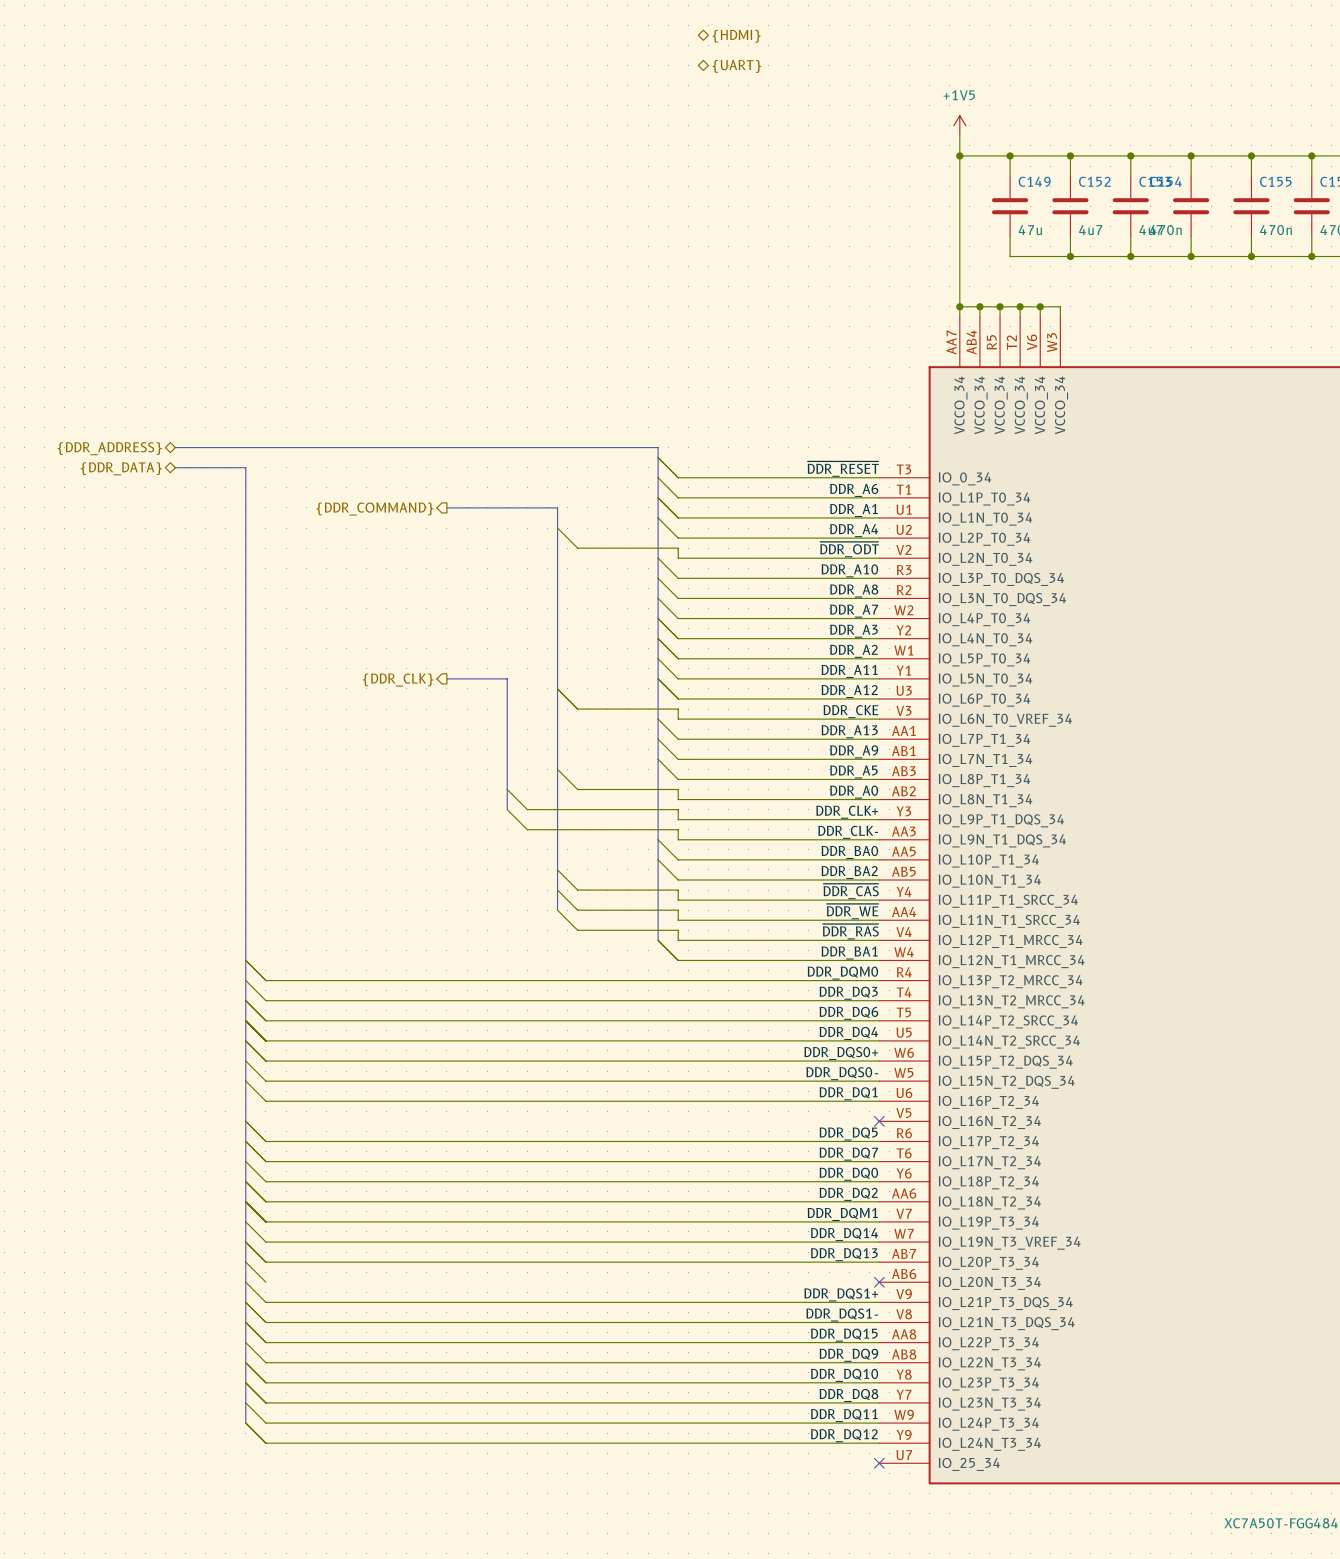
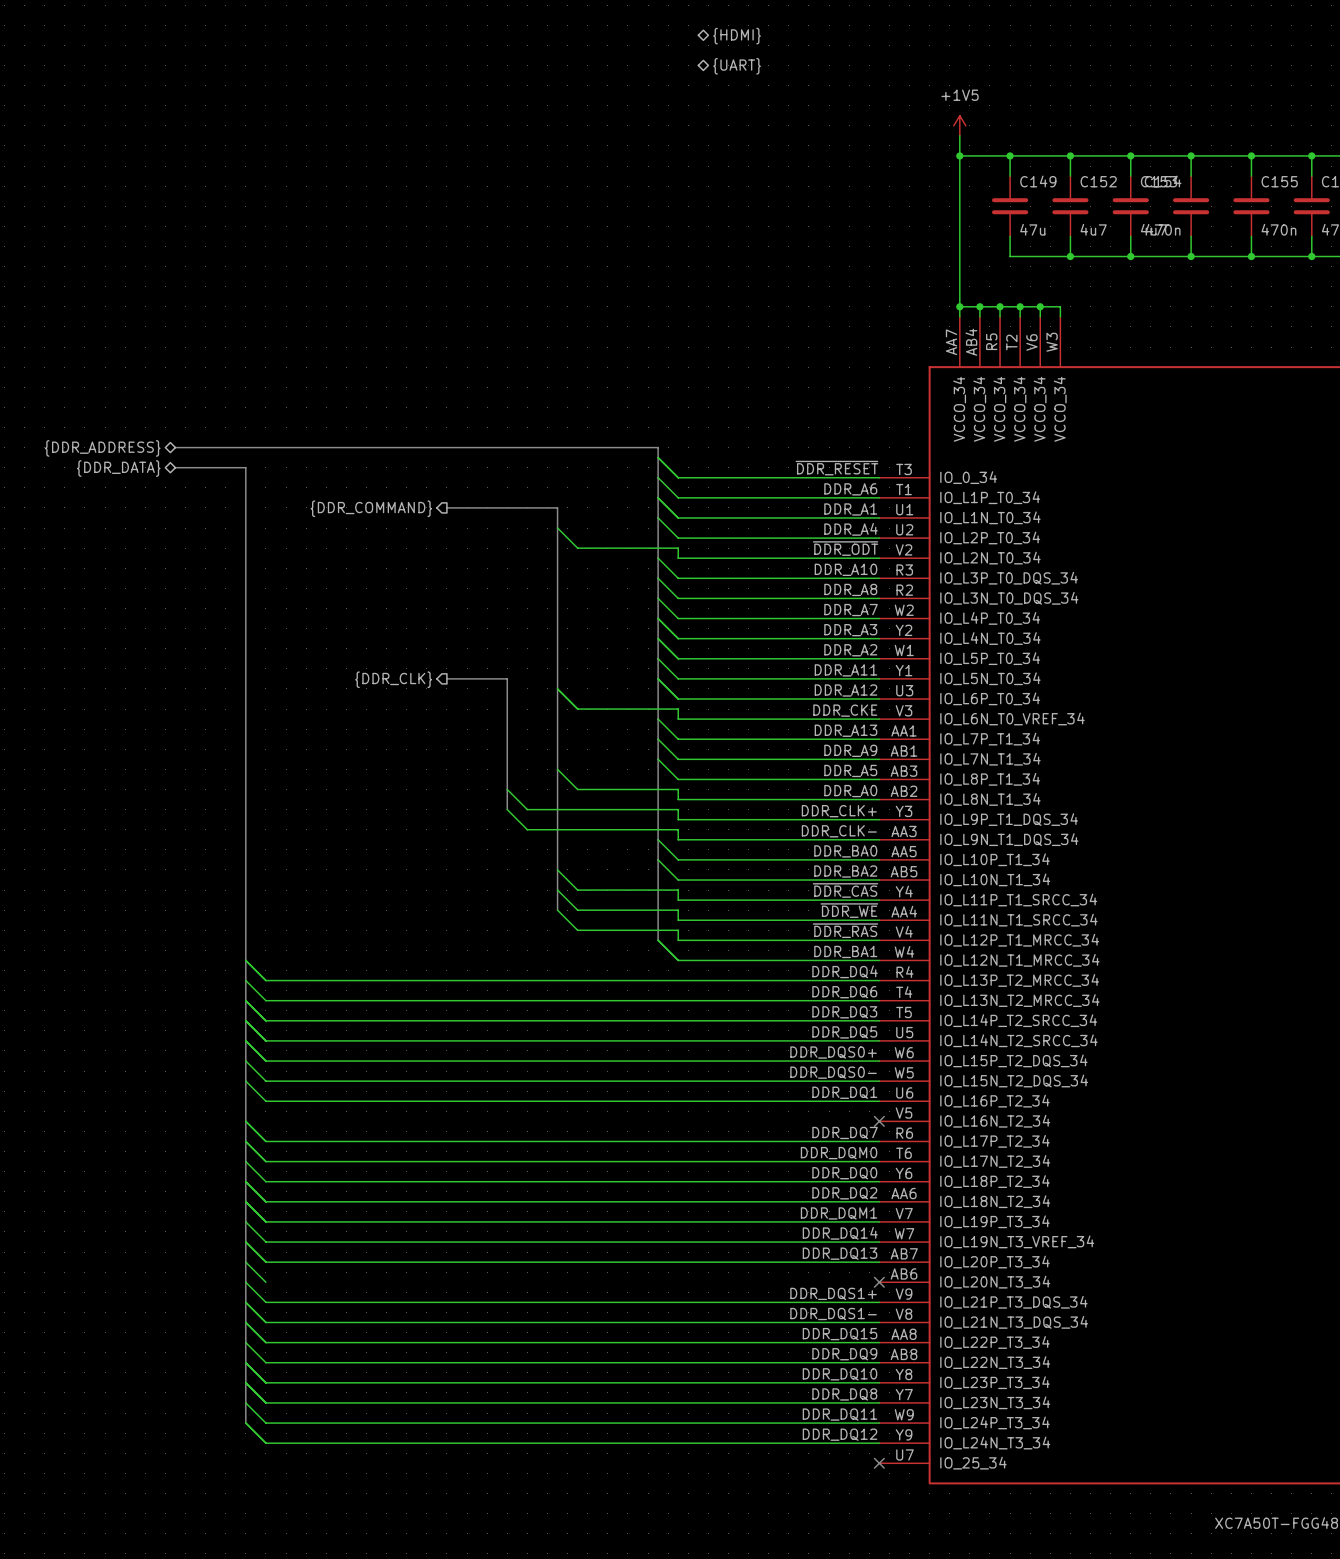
label: DDR_DQM0 (842, 973) -> DDR_DQ4 (845, 971)
label: DDR_DQ3 (848, 993) -> DDR_DQ6 (844, 992)
label: DDR_DQ6 (848, 1013) -> DDR_DQ3 (844, 1012)
label: DDR_DQ4 (848, 1033) -> DDR_DQ5 (844, 1032)
label: DDR_DQ5 (848, 1134) -> DDR_DQ7 (845, 1132)
label: DDR_DQ7 (848, 1154) -> DDR_DQM0 (839, 1153)

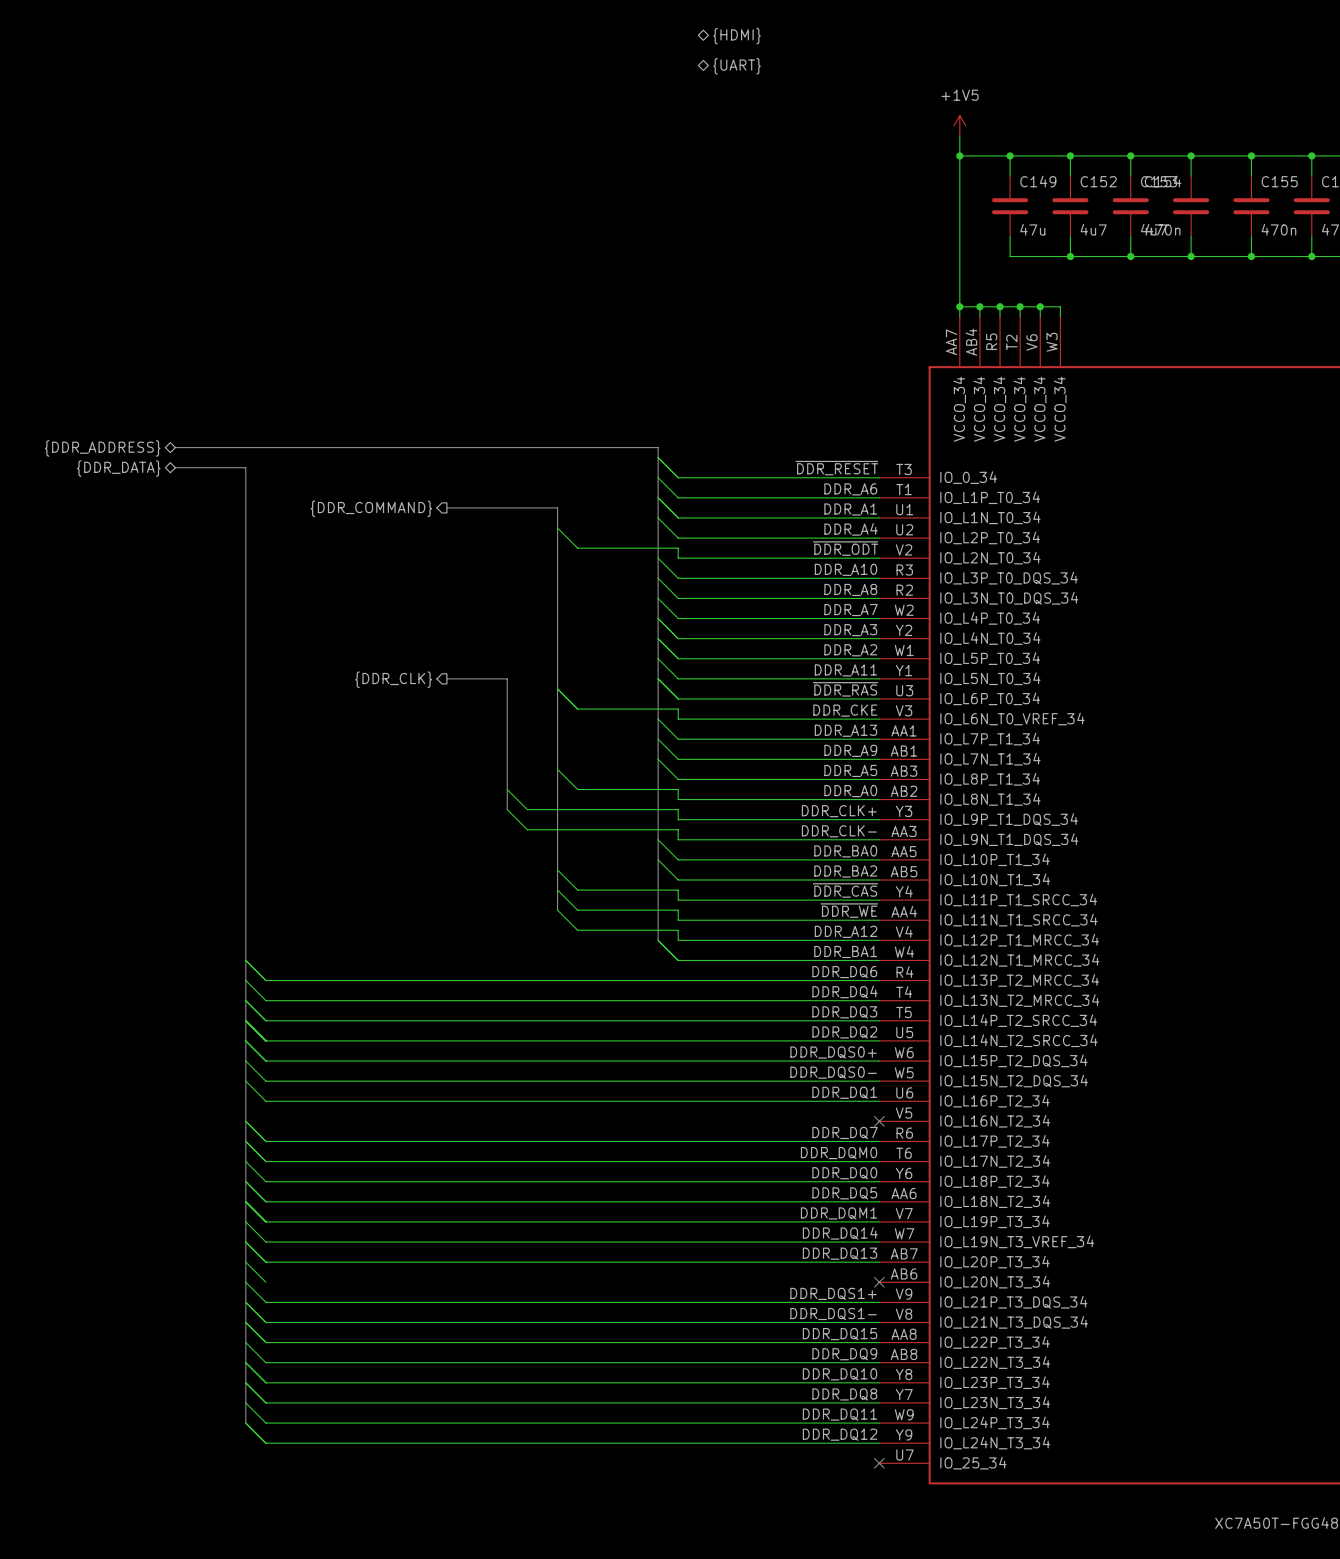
label: DDR_A12 (846, 690) -> ~{DDR_RAS} (845, 689)
label: ~{DDR_RAS} (845, 930) -> DDR_A12 (846, 931)
label: DDR_DQ4 (845, 971) -> DDR_DQ6 (844, 972)
label: DDR_DQ6 (844, 992) -> DDR_DQ4 (845, 991)
label: DDR_DQ5 (844, 1032) -> DDR_DQ2 (844, 1032)
label: DDR_DQ2 (844, 1193) -> DDR_DQ5 (844, 1193)

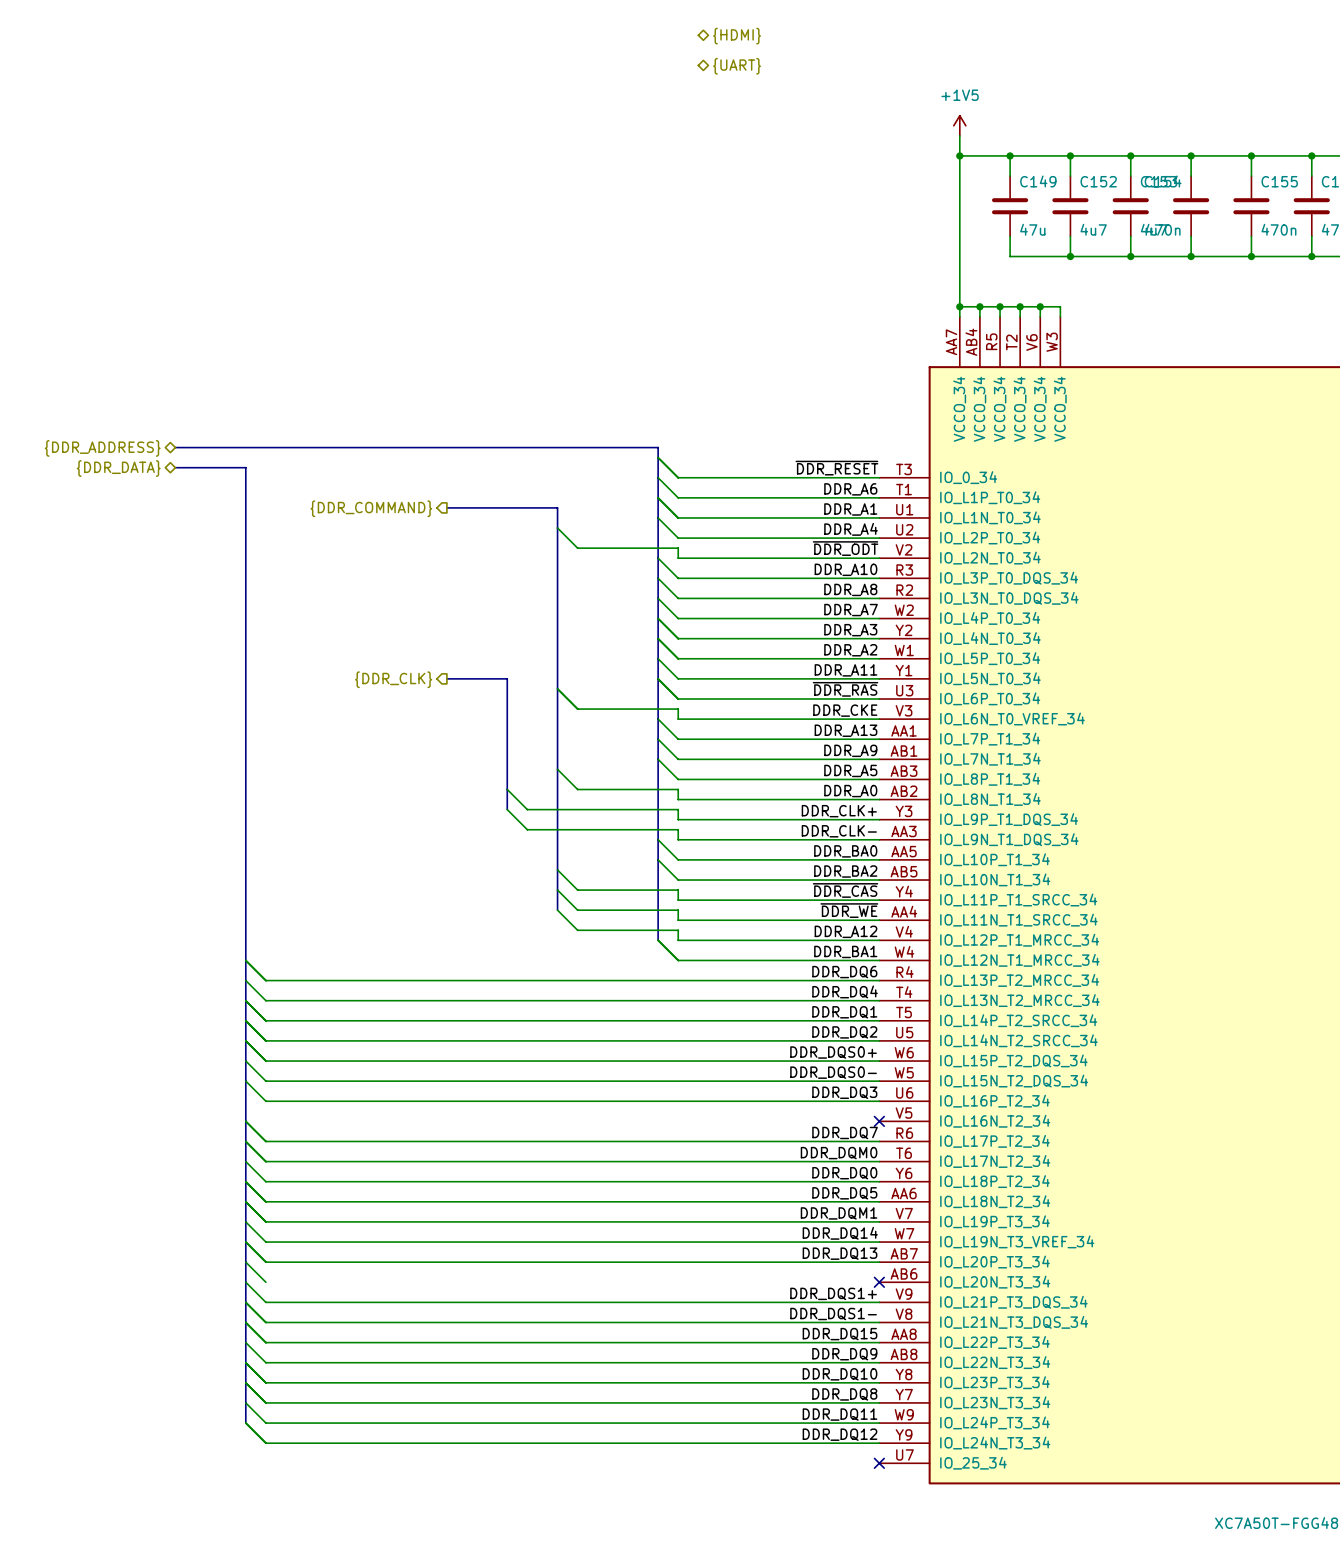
label: DDR_DQ3 (844, 1012) -> DDR_DQ1 (844, 1012)
label: DDR_DQ1 (844, 1092) -> DDR_DQ3 (844, 1092)

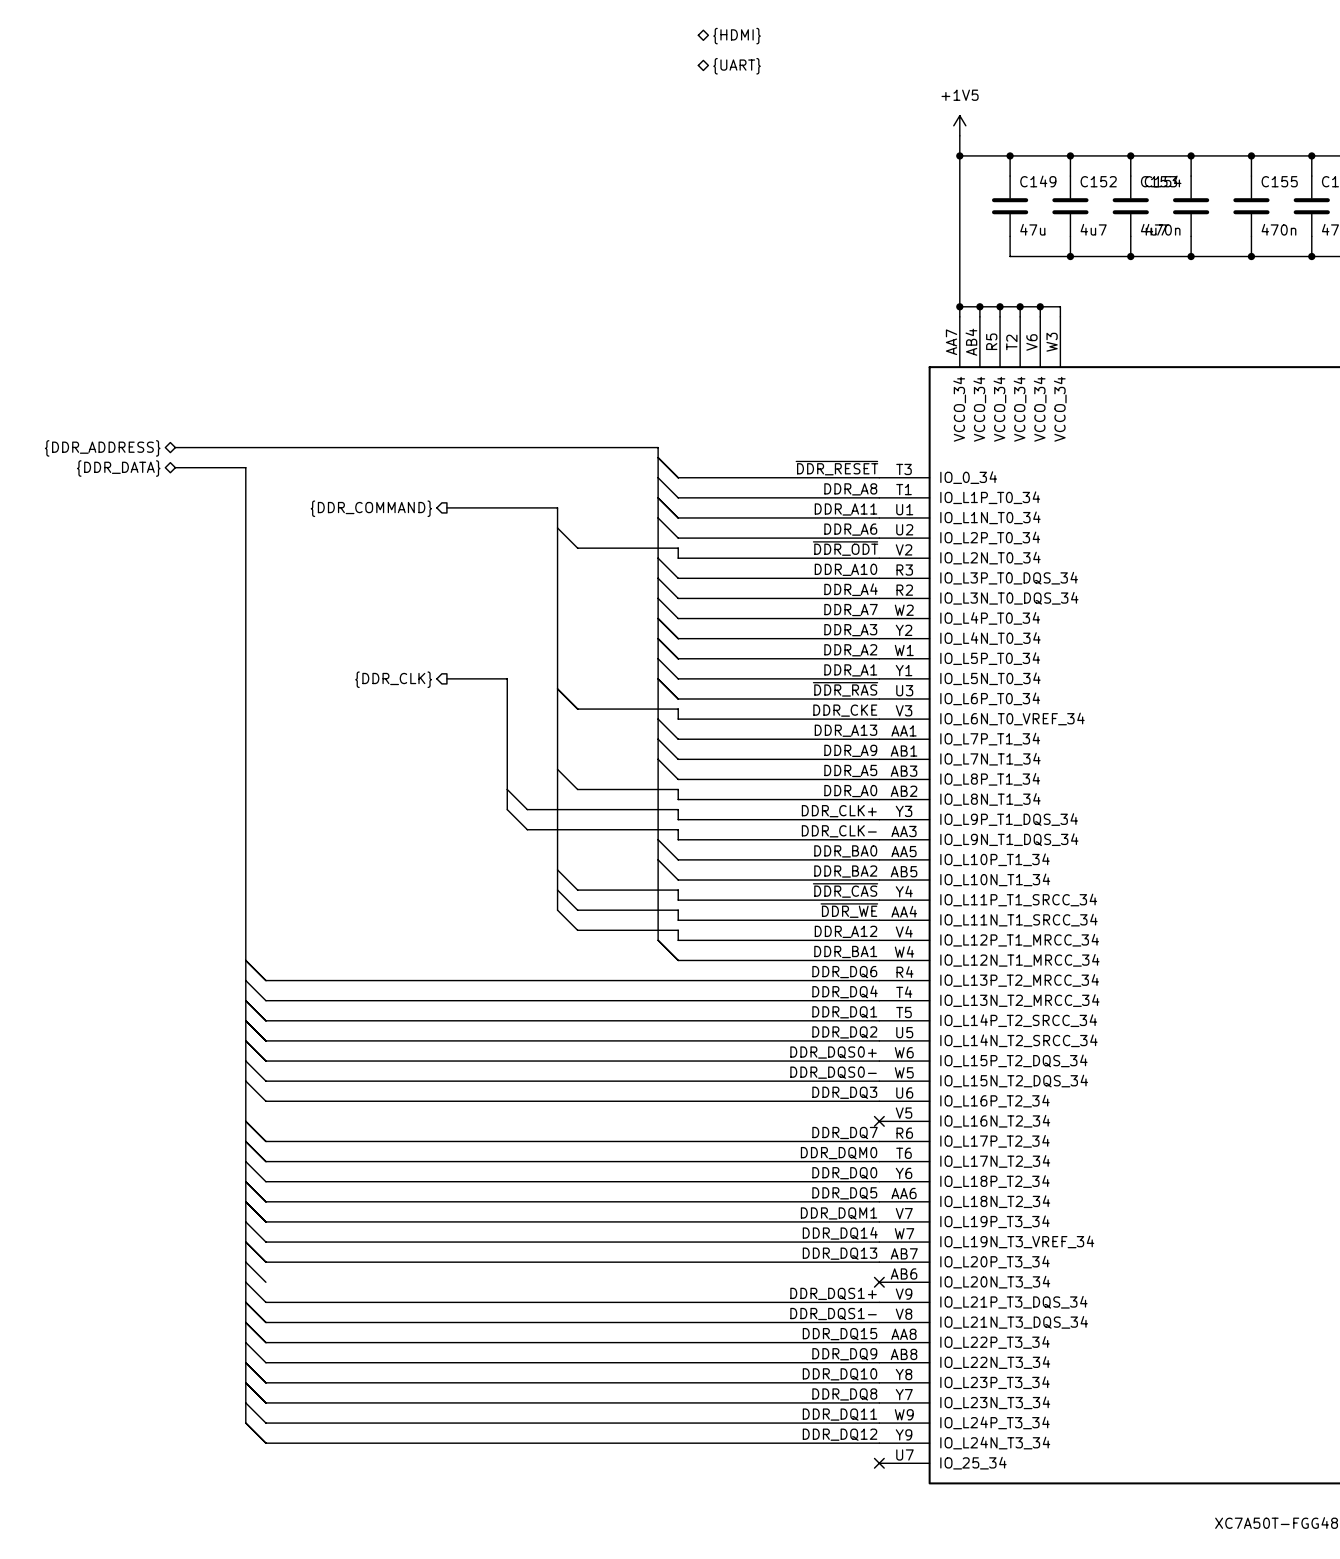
label: DDR_A6 (850, 489) -> DDR_A8 (850, 489)
label: DDR_A1 (850, 509) -> DDR_A11 (846, 509)
label: DDR_A4 (851, 529) -> DDR_A6 (850, 529)
label: DDR_A8 (850, 589) -> DDR_A4 (851, 589)
label: DDR_A11 (846, 670) -> DDR_A1 (850, 670)

